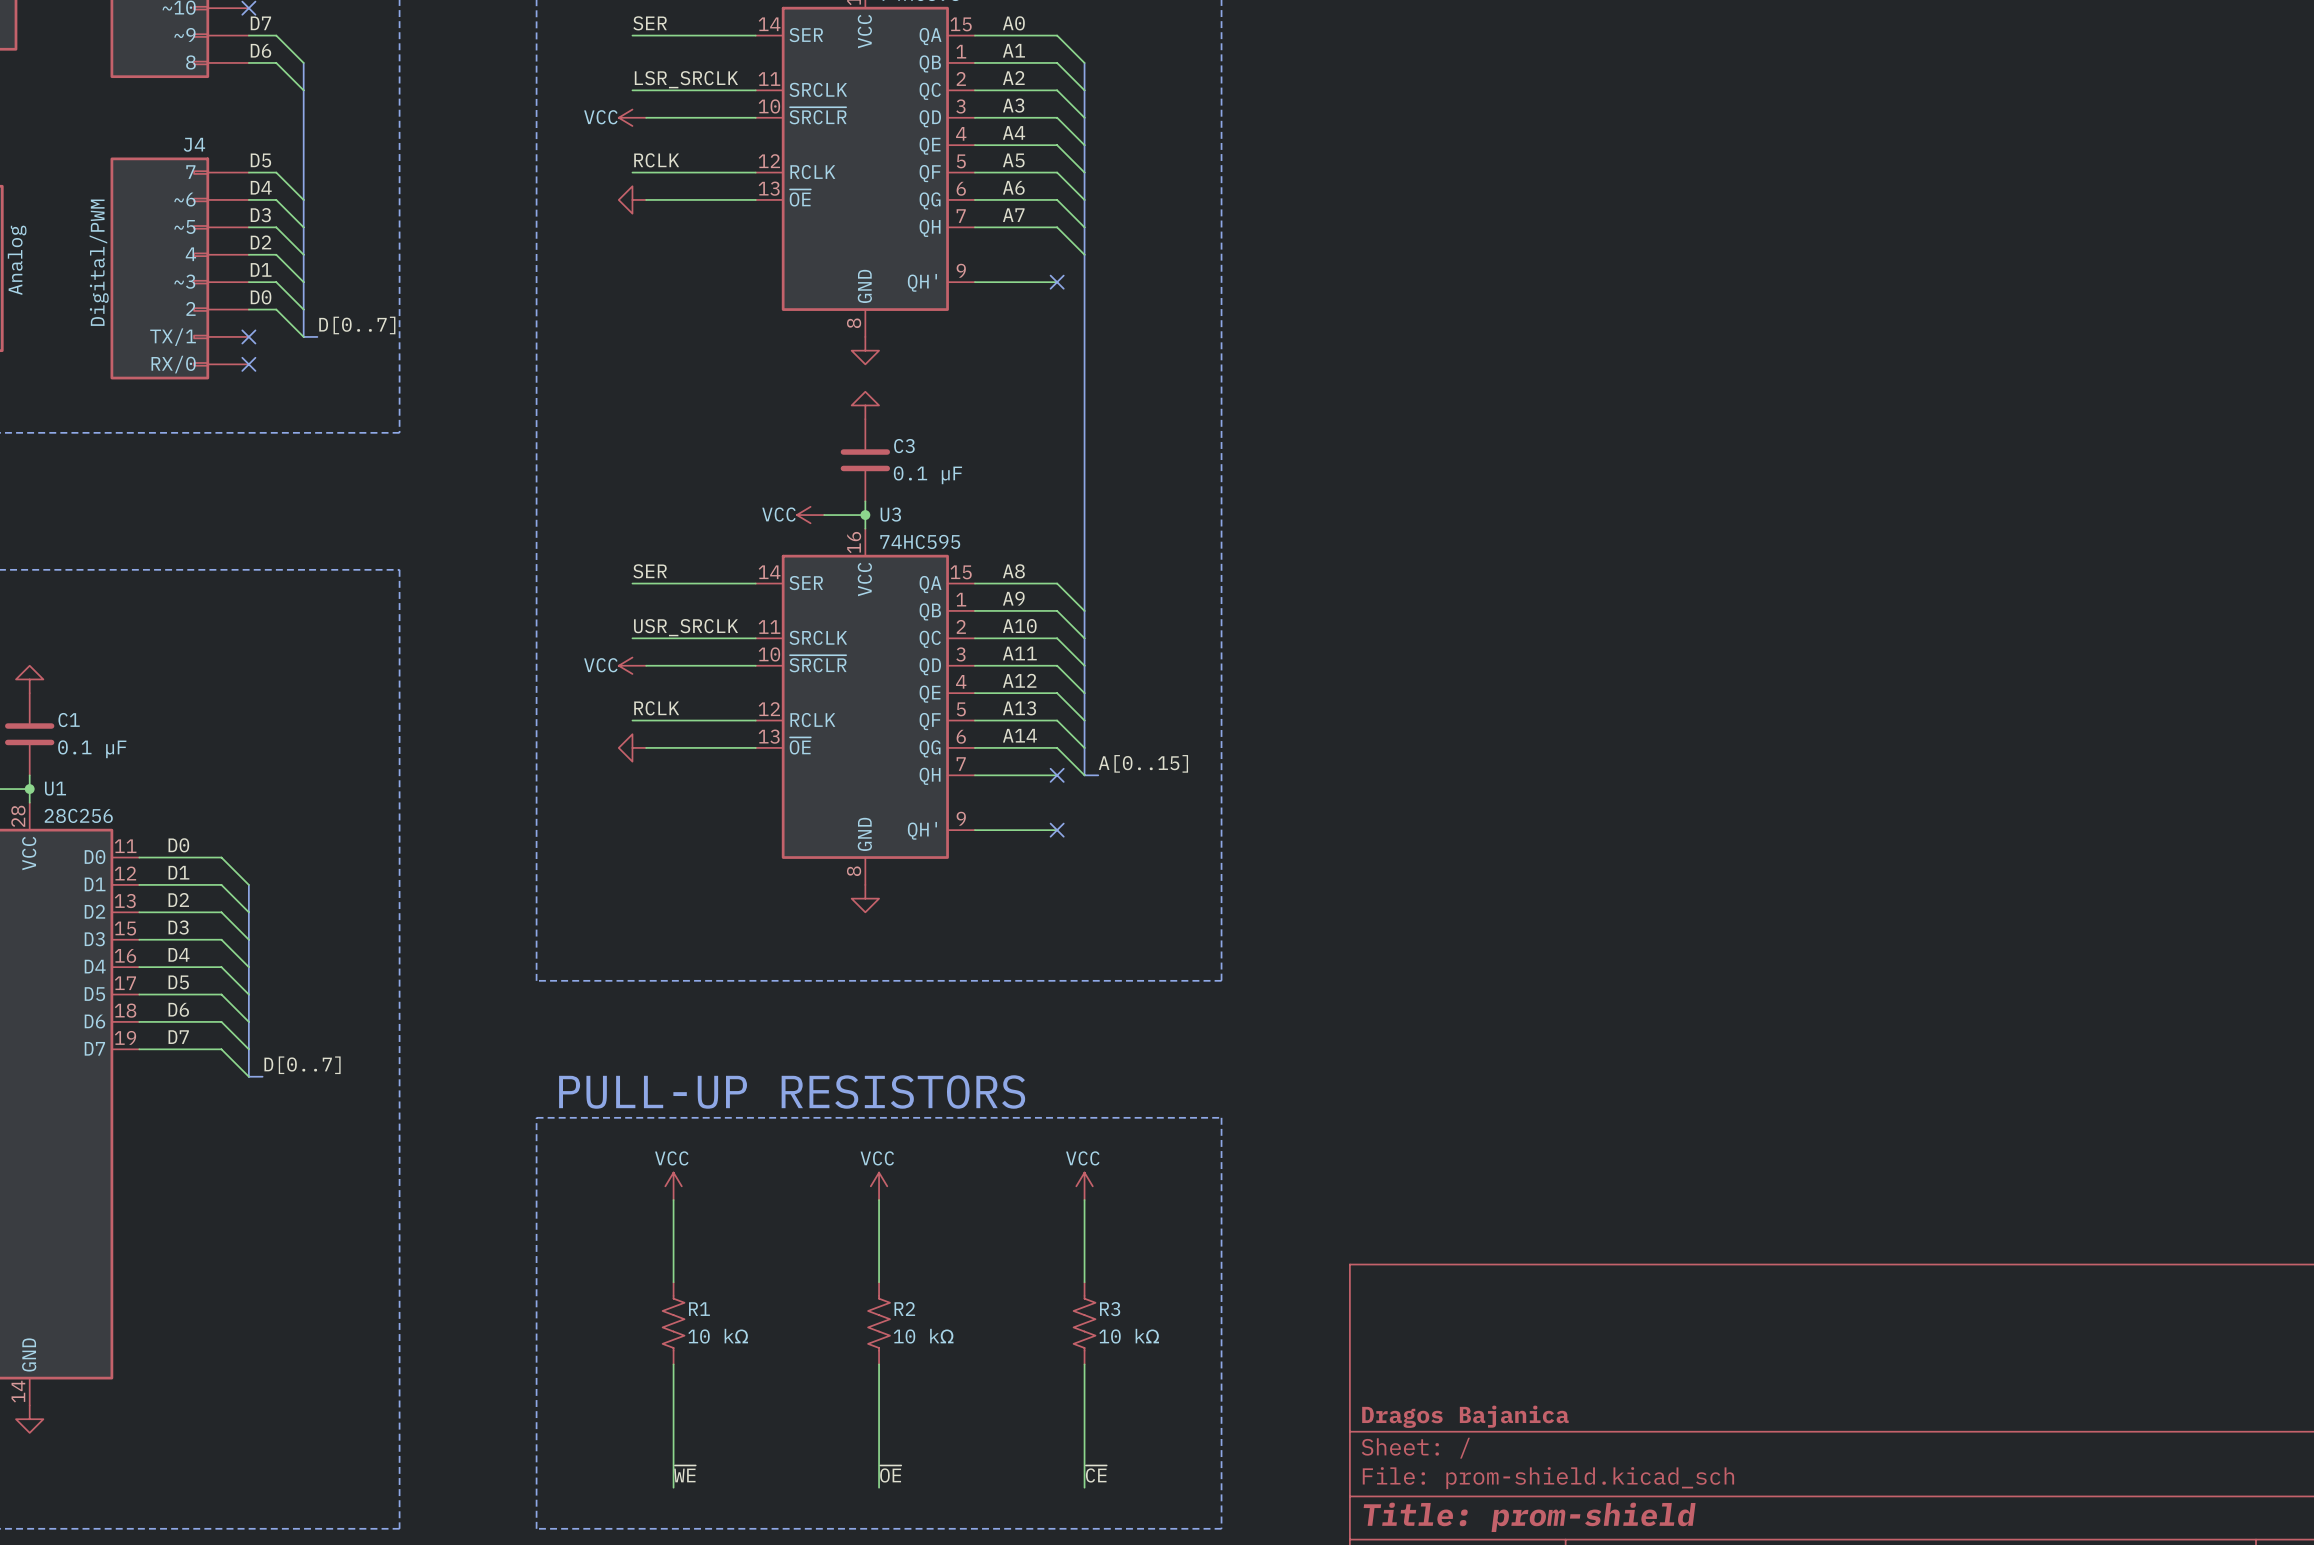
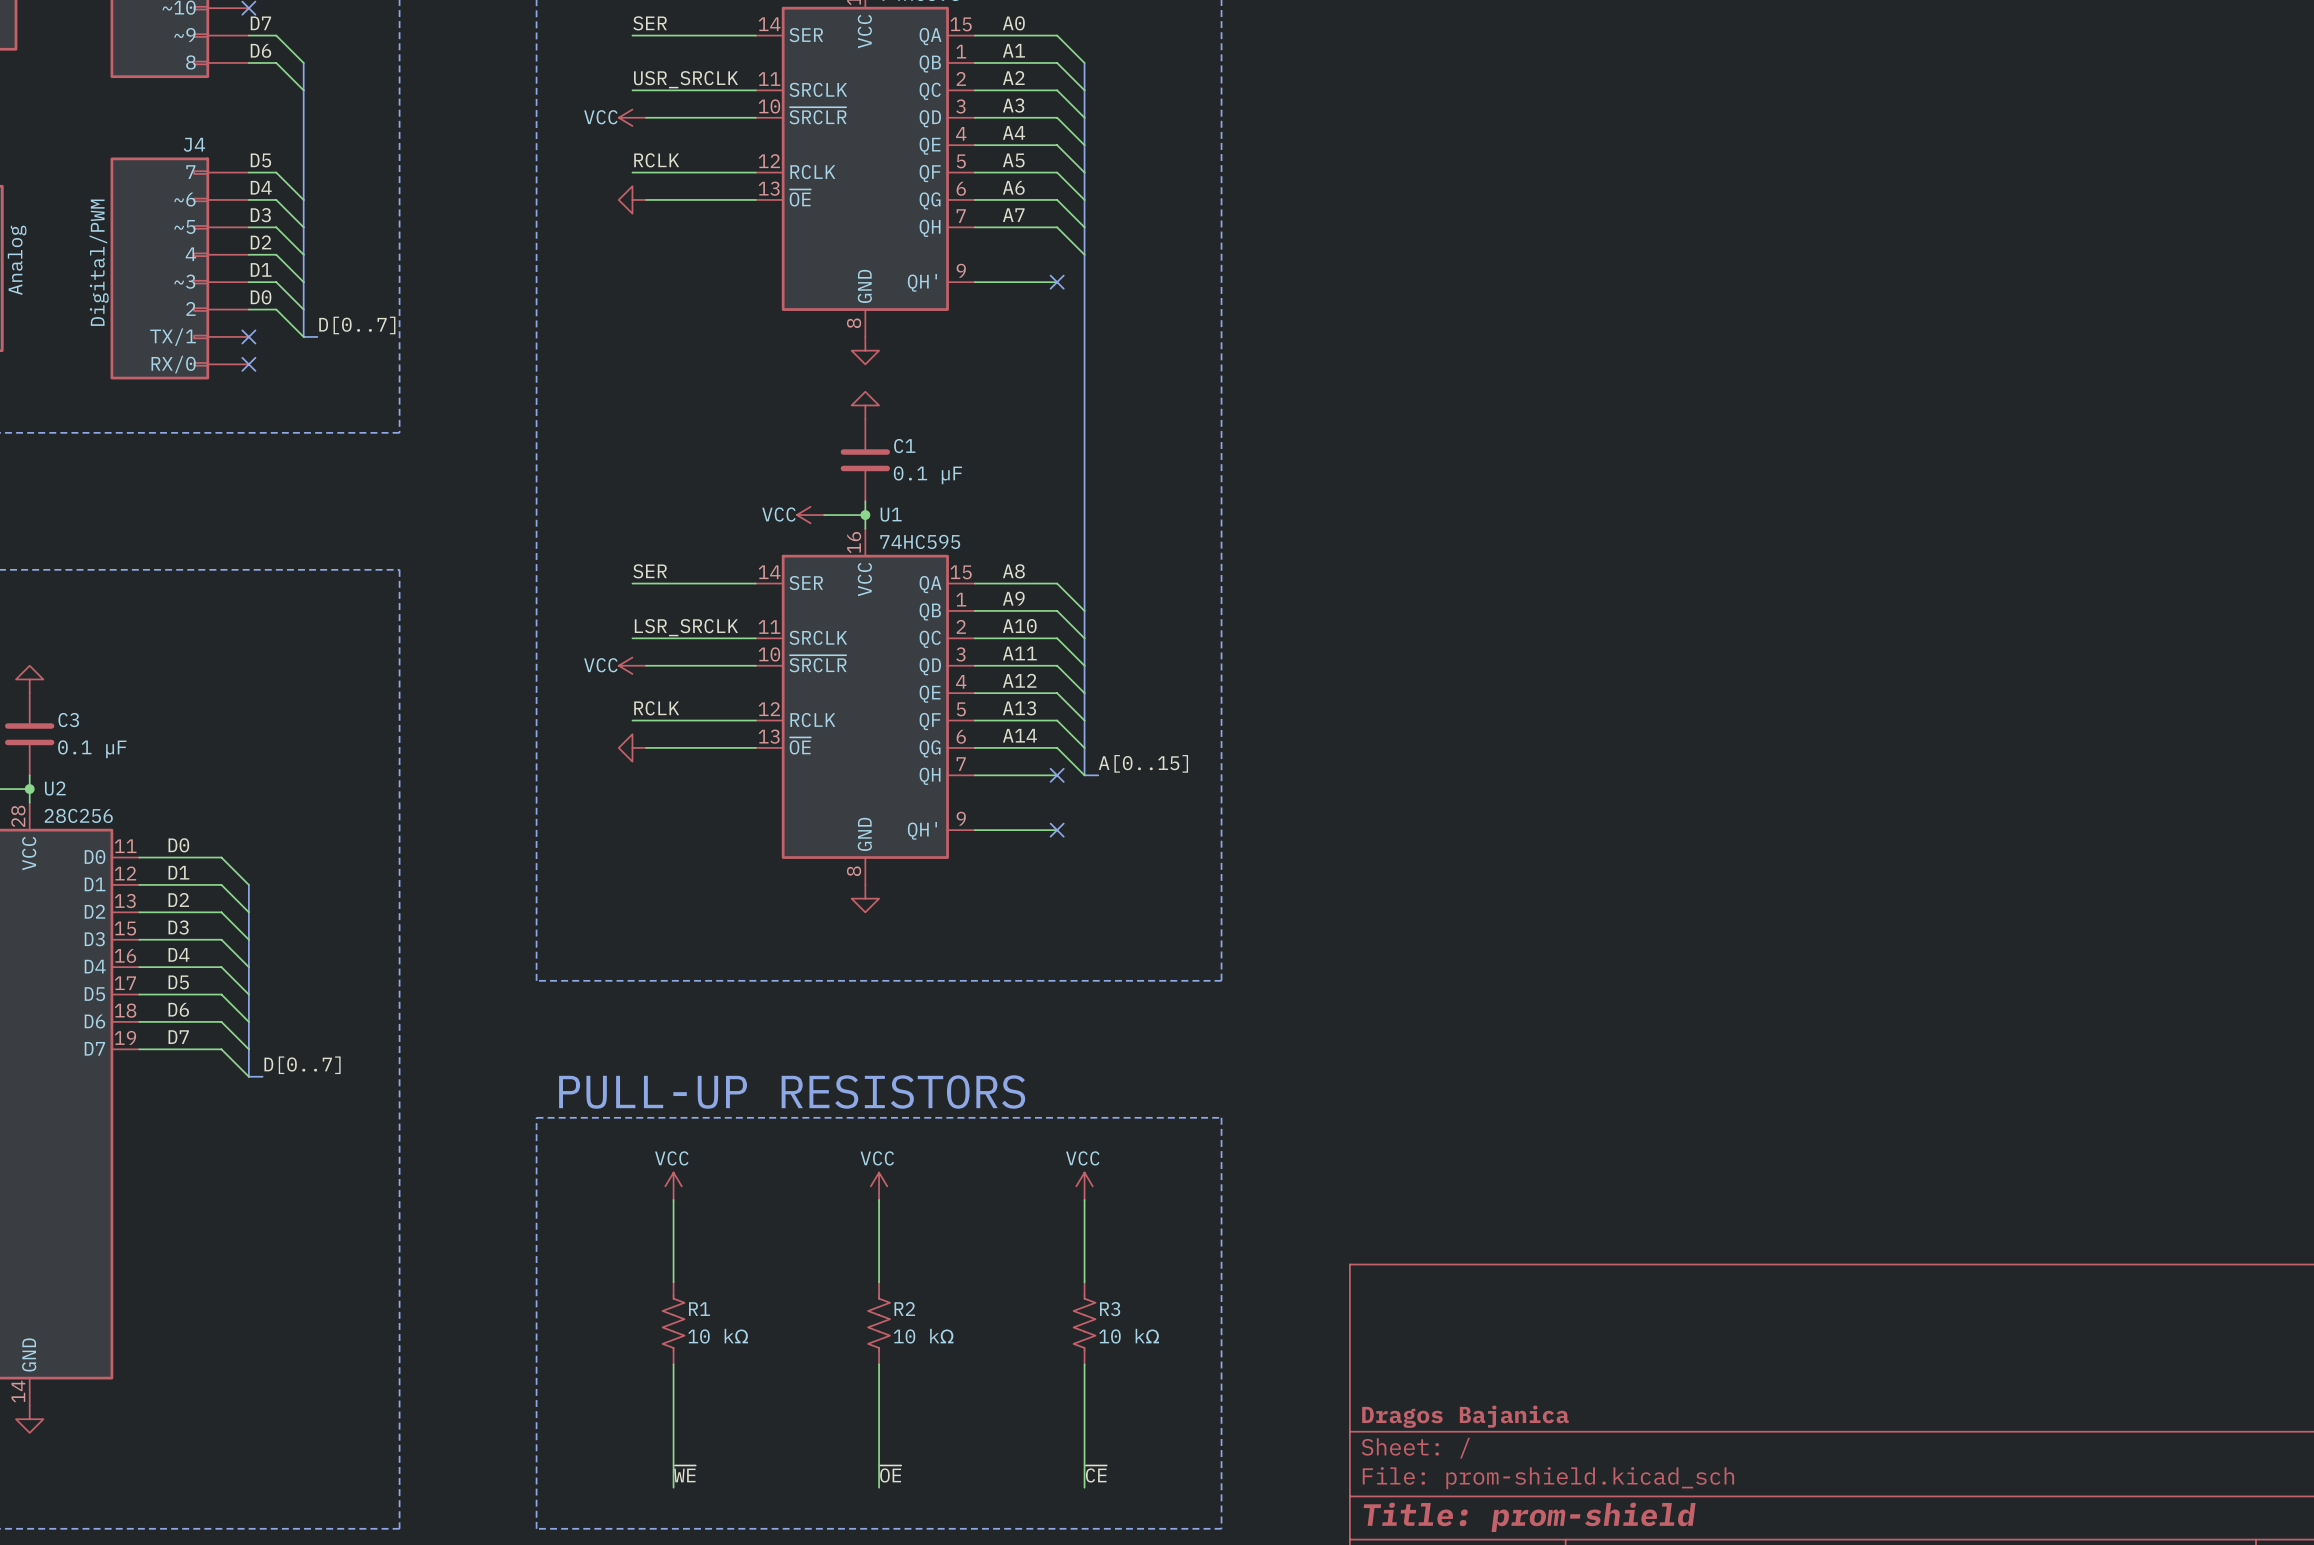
label: LSR_SRCLK (686, 79) -> USR_SRCLK (686, 79)
C3 name: C3 (904, 446) -> C1 (904, 446)
U3 name: U3 (890, 514) -> U1 (891, 514)
label: USR_SRCLK (686, 627) -> LSR_SRCLK (686, 627)
C1 name: C1 (69, 720) -> C3 (68, 720)
U1 name: U1 (55, 788) -> U2 (55, 788)

